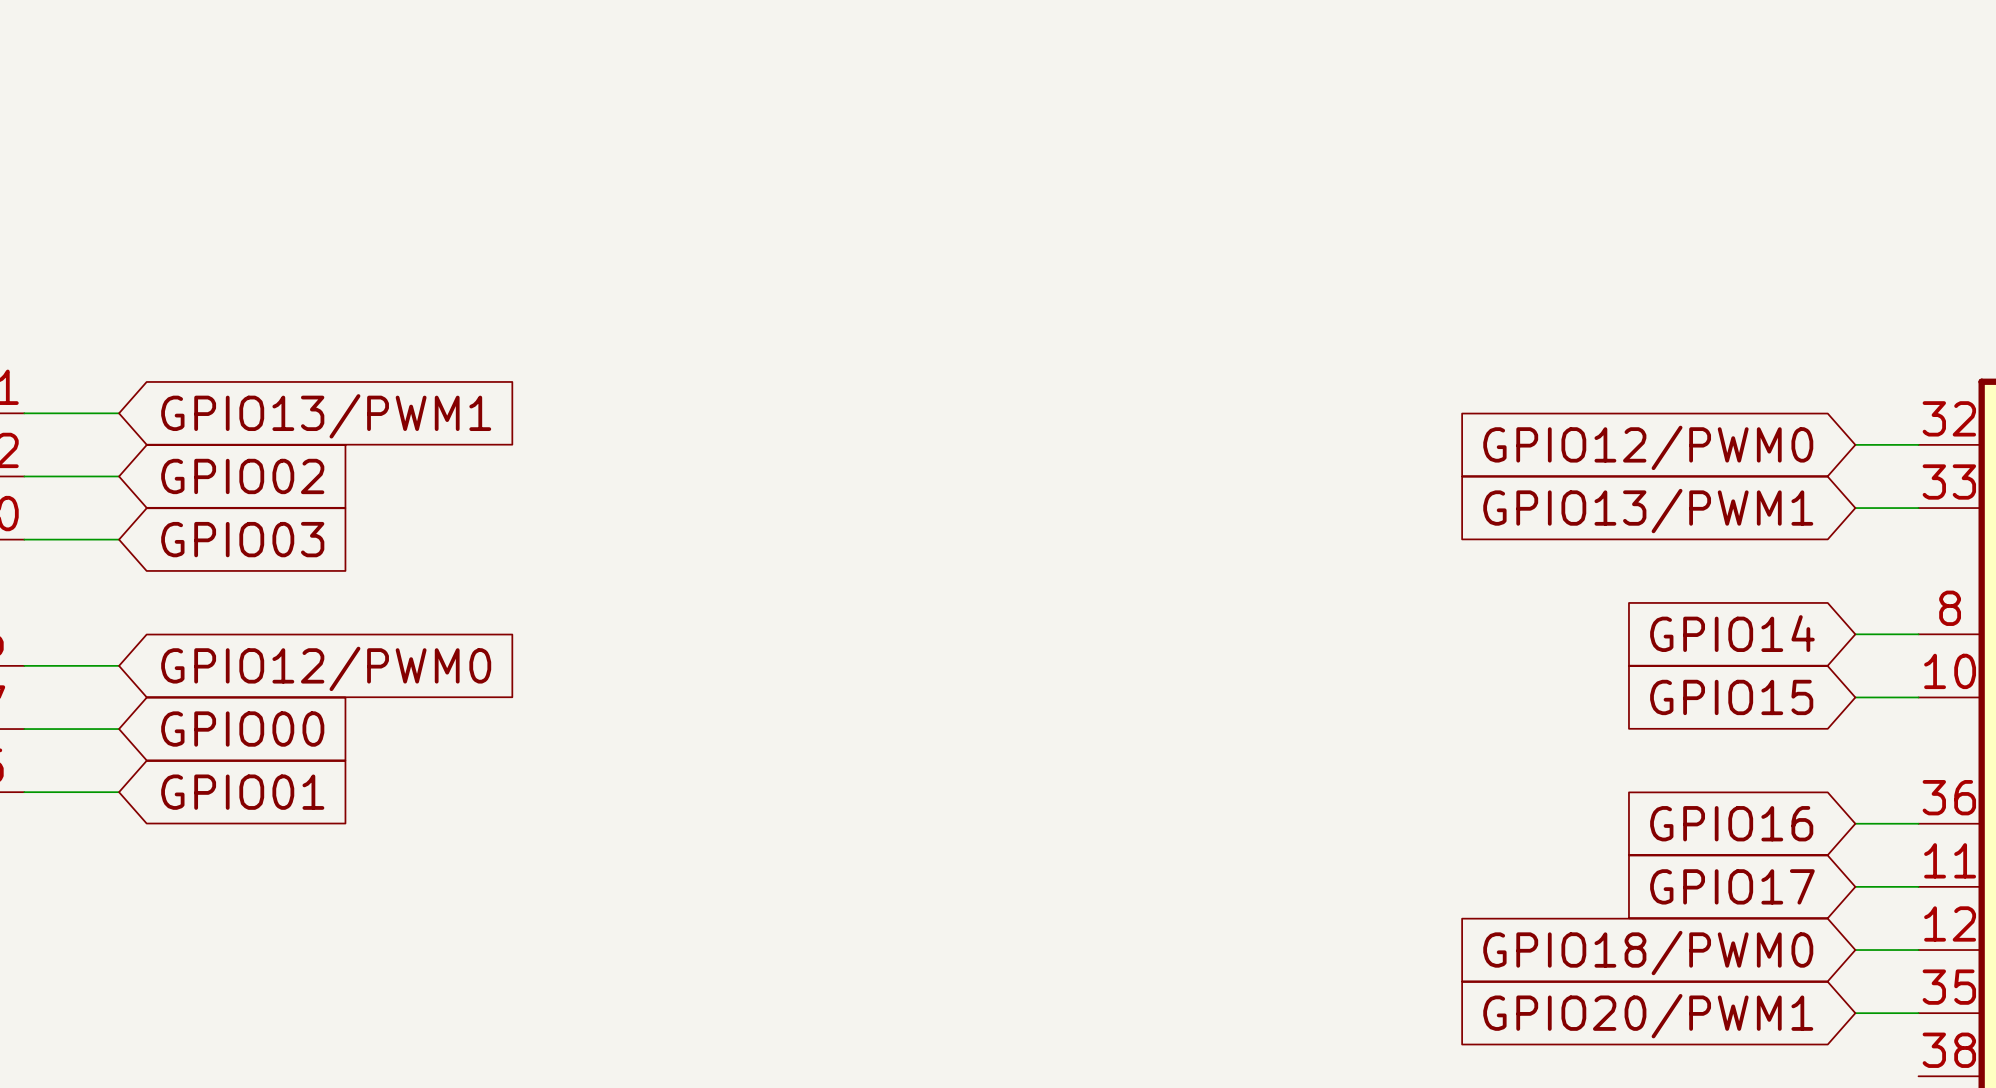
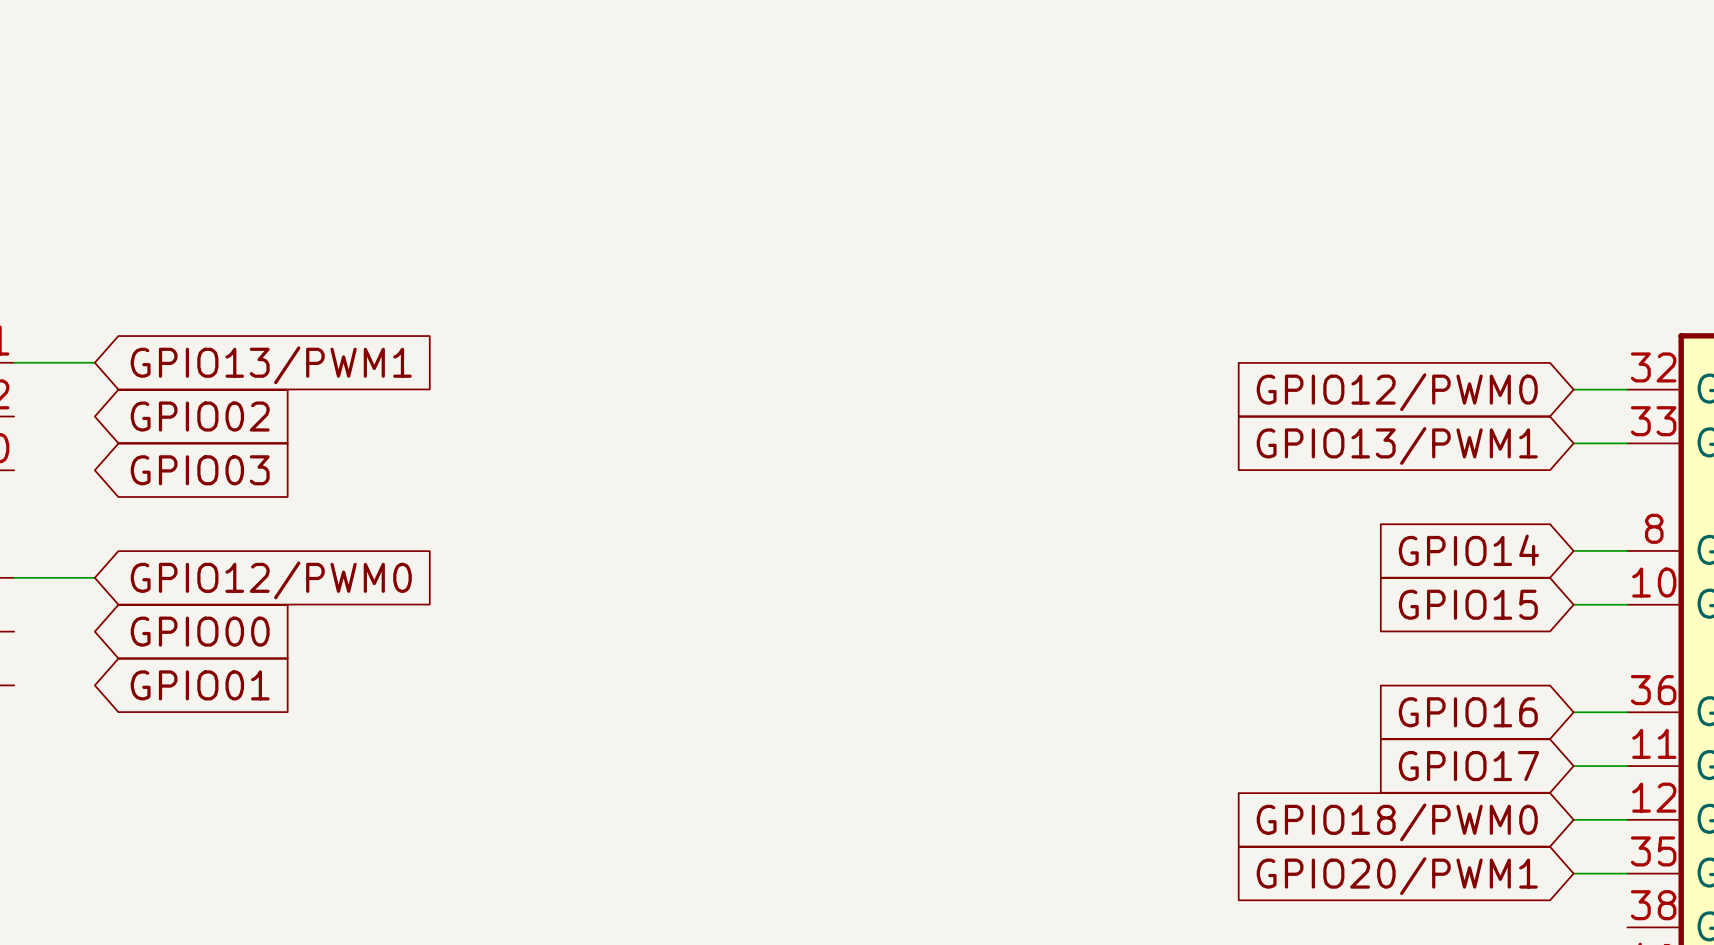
wire: (24, 476) (119, 476) -> none
wire: (24, 539) (119, 539) -> none
wire: (24, 729) (119, 729) -> none
wire: (24, 792) (119, 792) -> none

